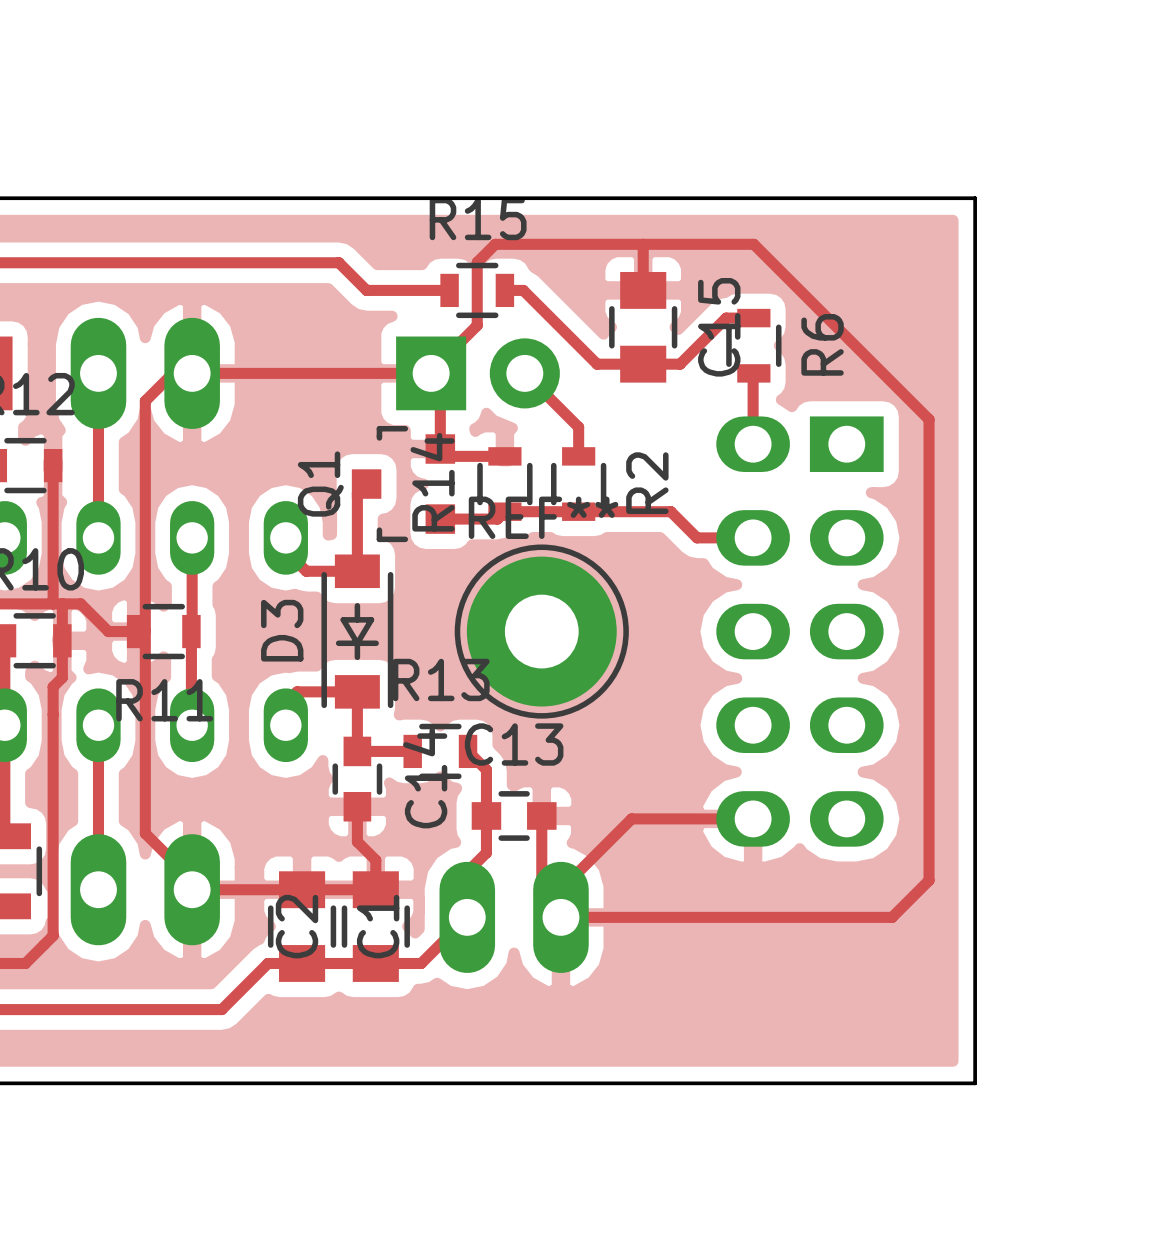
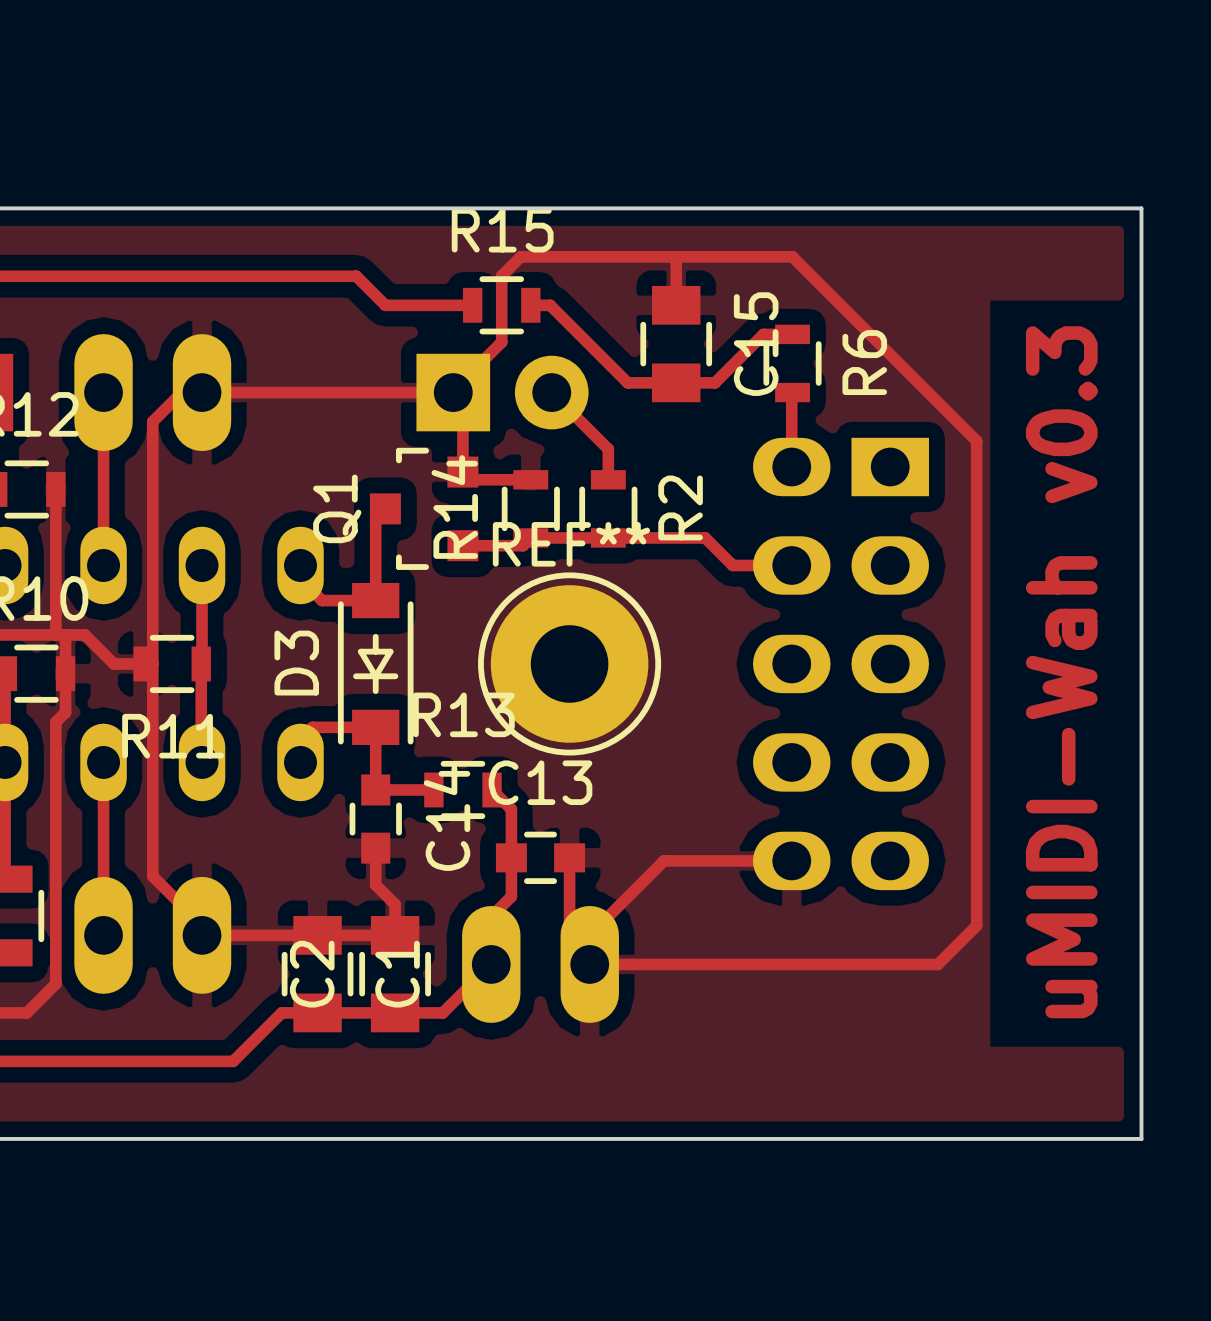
board edge: (975, 198) (975, 1083) -> (1025, 208) (1141, 208) (1141, 1138) (1025, 1138)
text: none -> uMIDI-Wah v0.3 (1061, 672)

